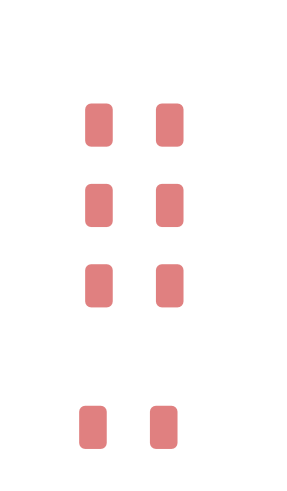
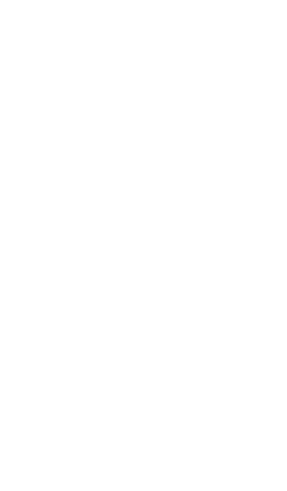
part: (134, 125) -> none
part: (134, 205) -> none
part: (134, 285) -> none
part: (128, 427) -> none

